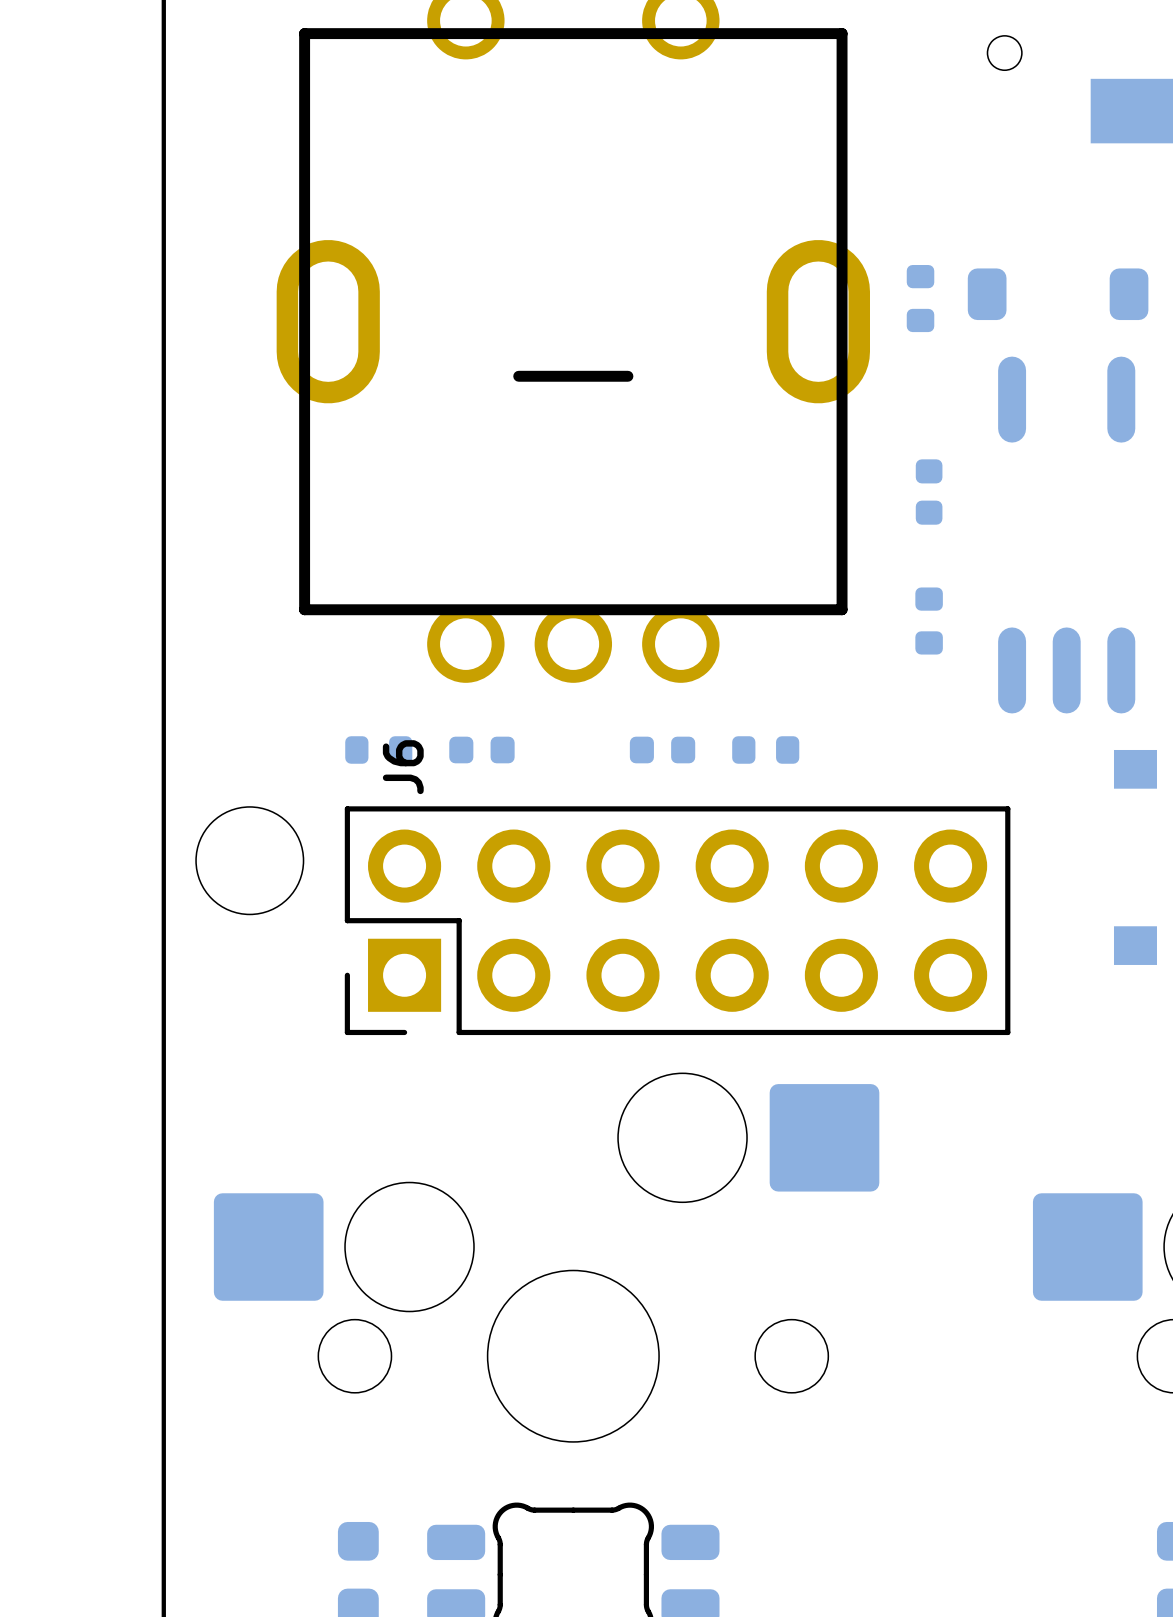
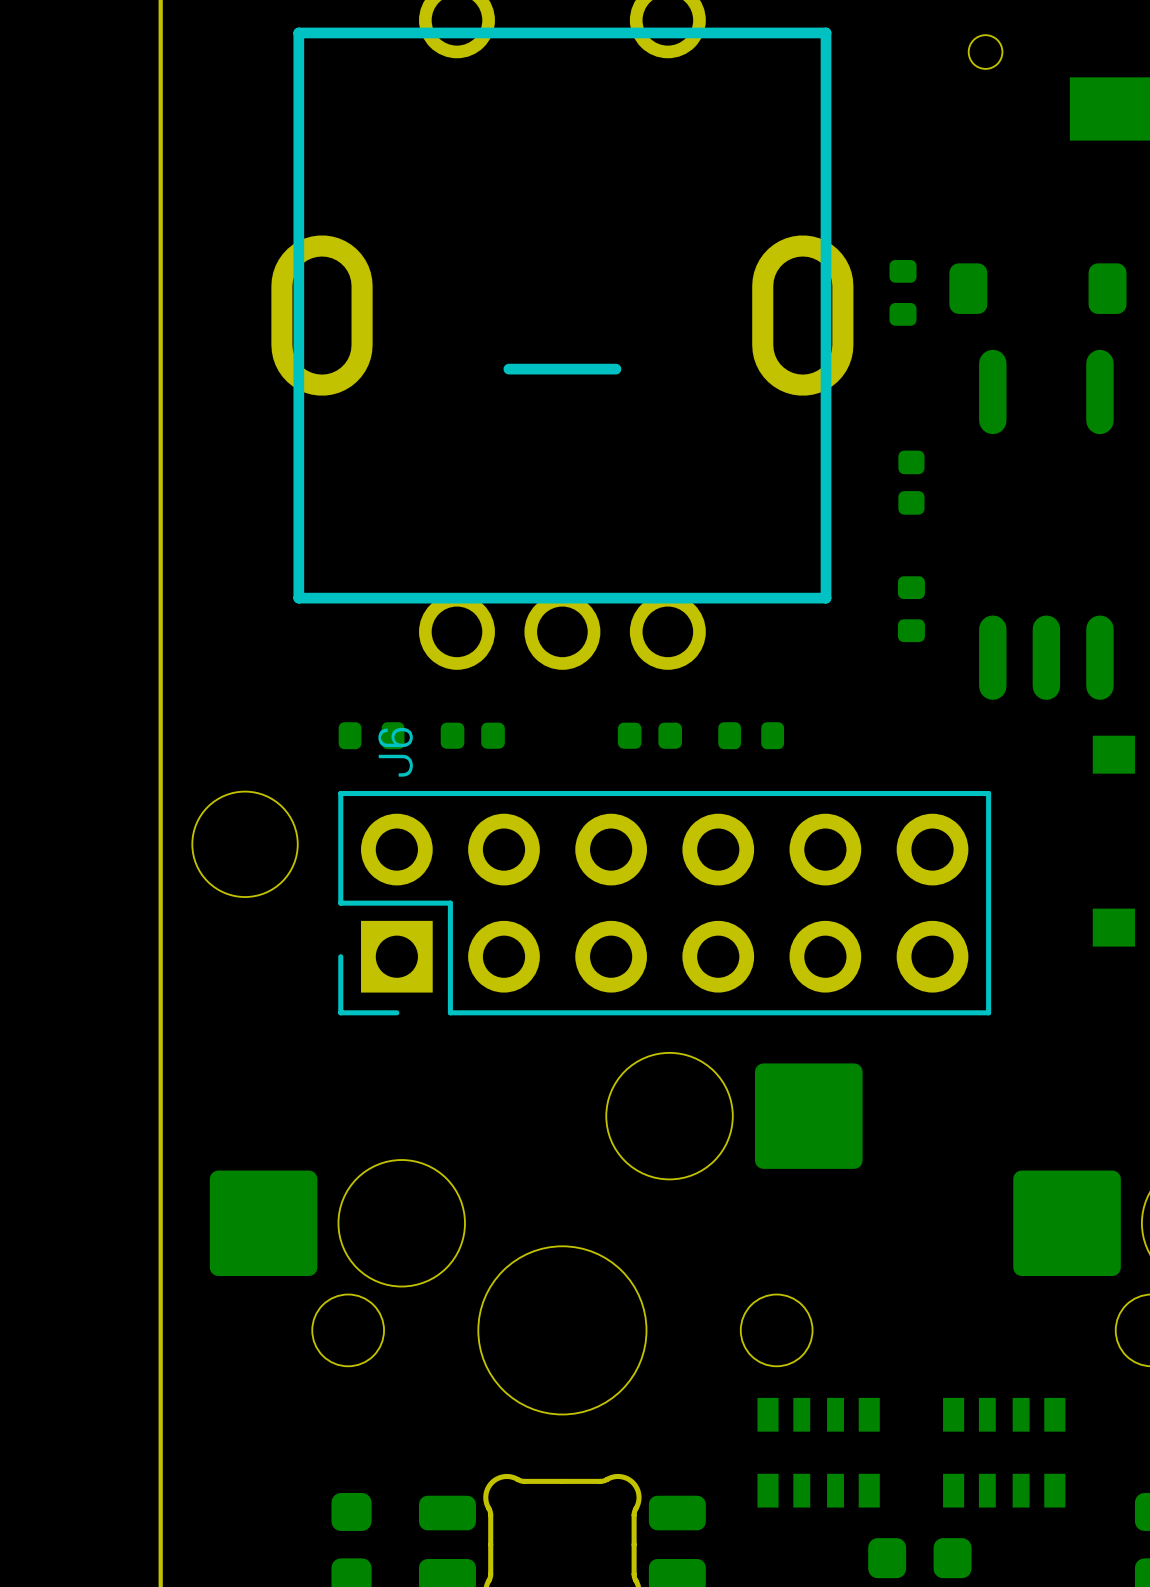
part: none -> (818, 1452)
part: none -> (1004, 1452)
part: none -> (919, 1558)

